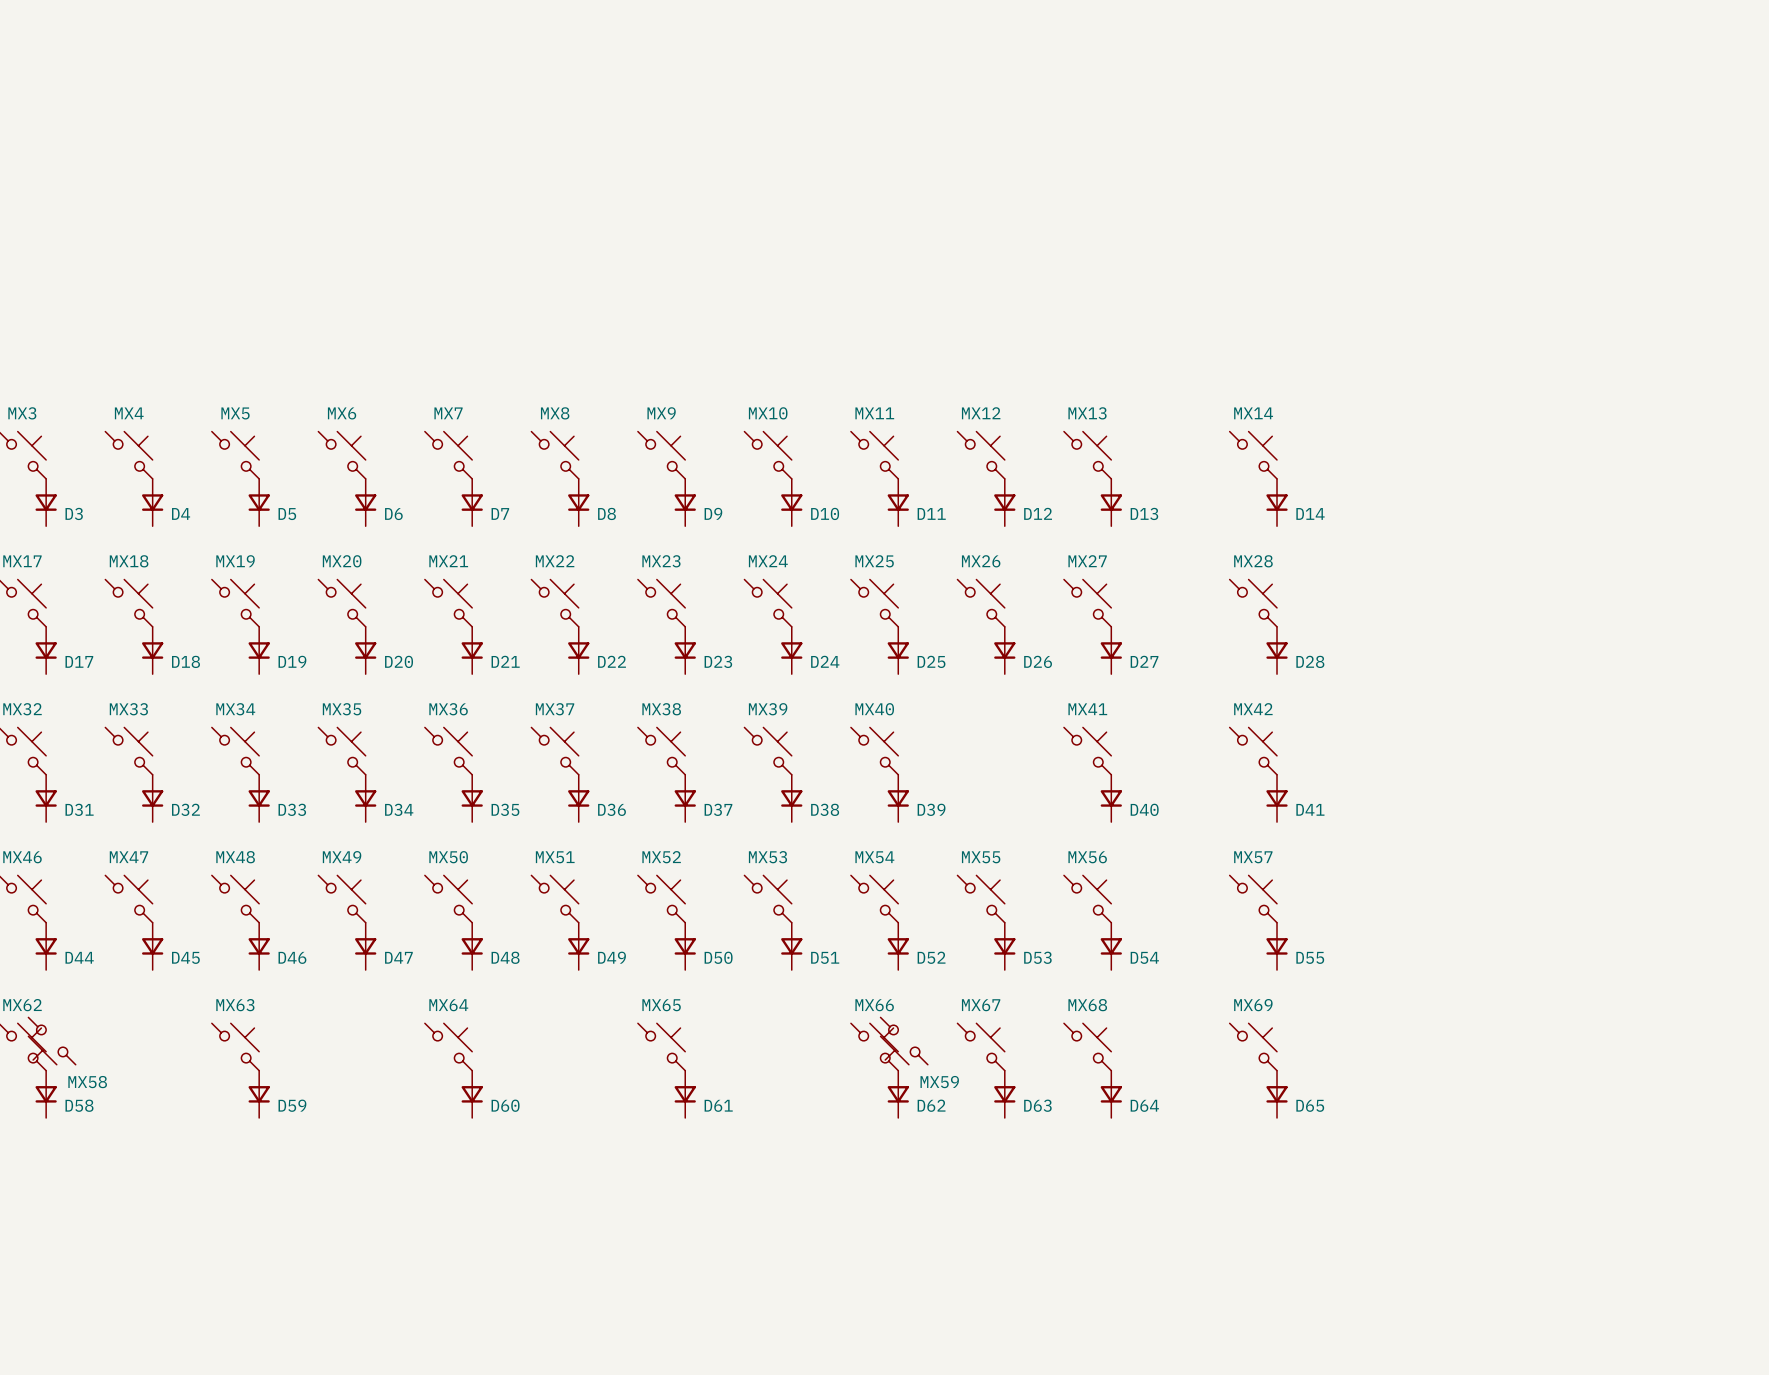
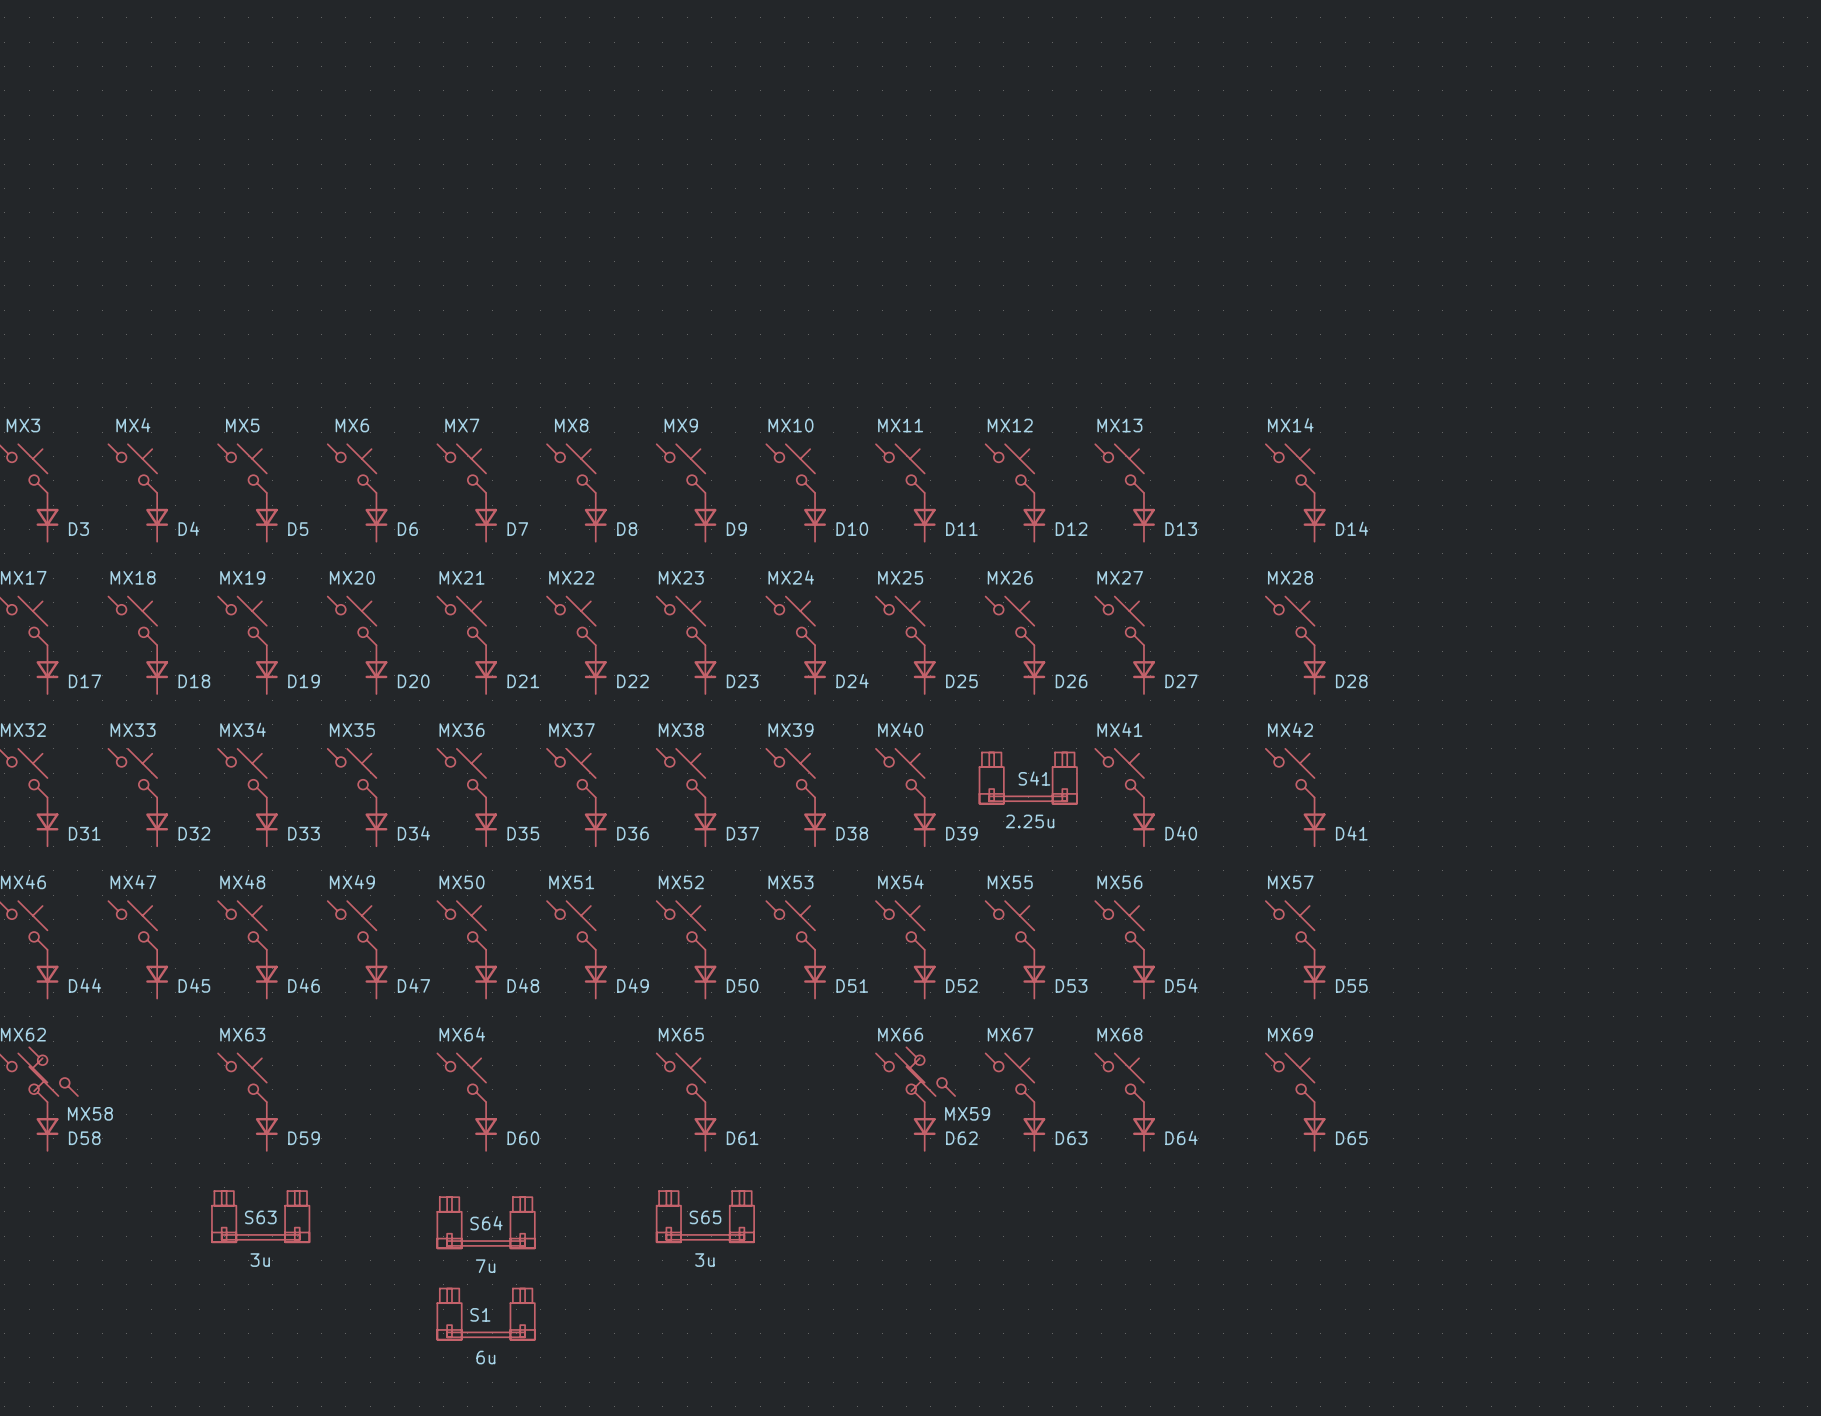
S41: none -> 2.25u (1028, 778)
S63: none -> 3u (260, 1216)
S65: none -> 3u (705, 1216)
S64: none -> 7u (486, 1222)
S1: none -> 6u (486, 1314)

